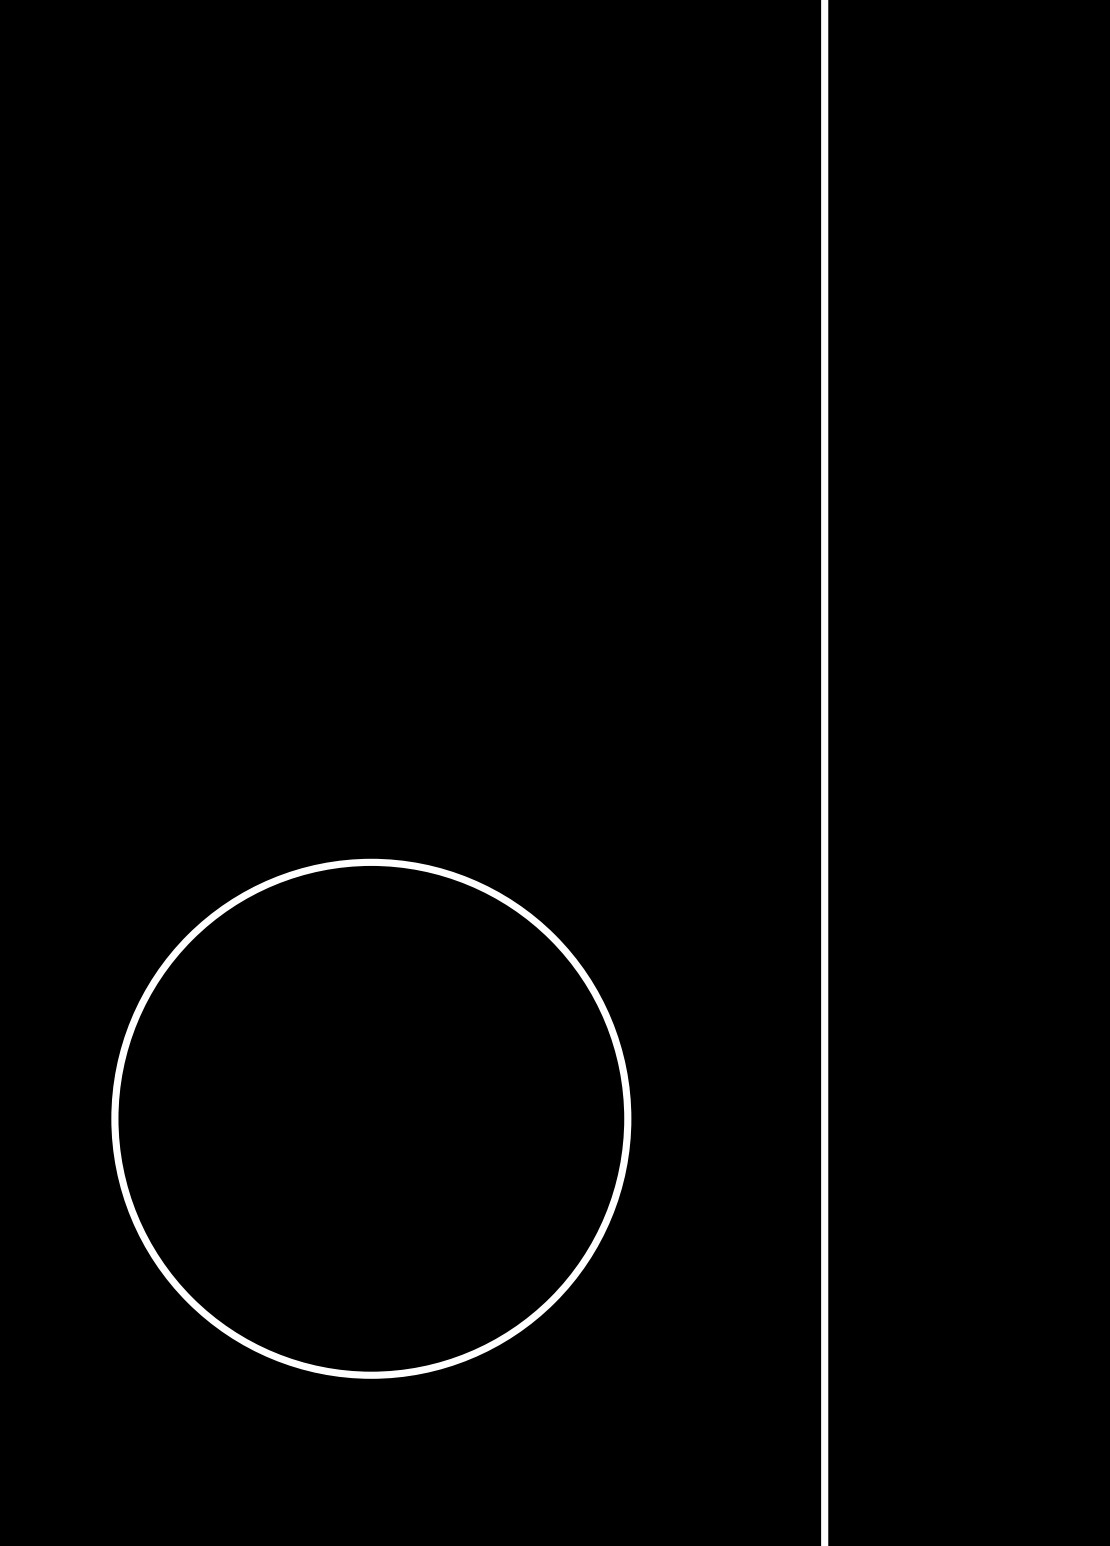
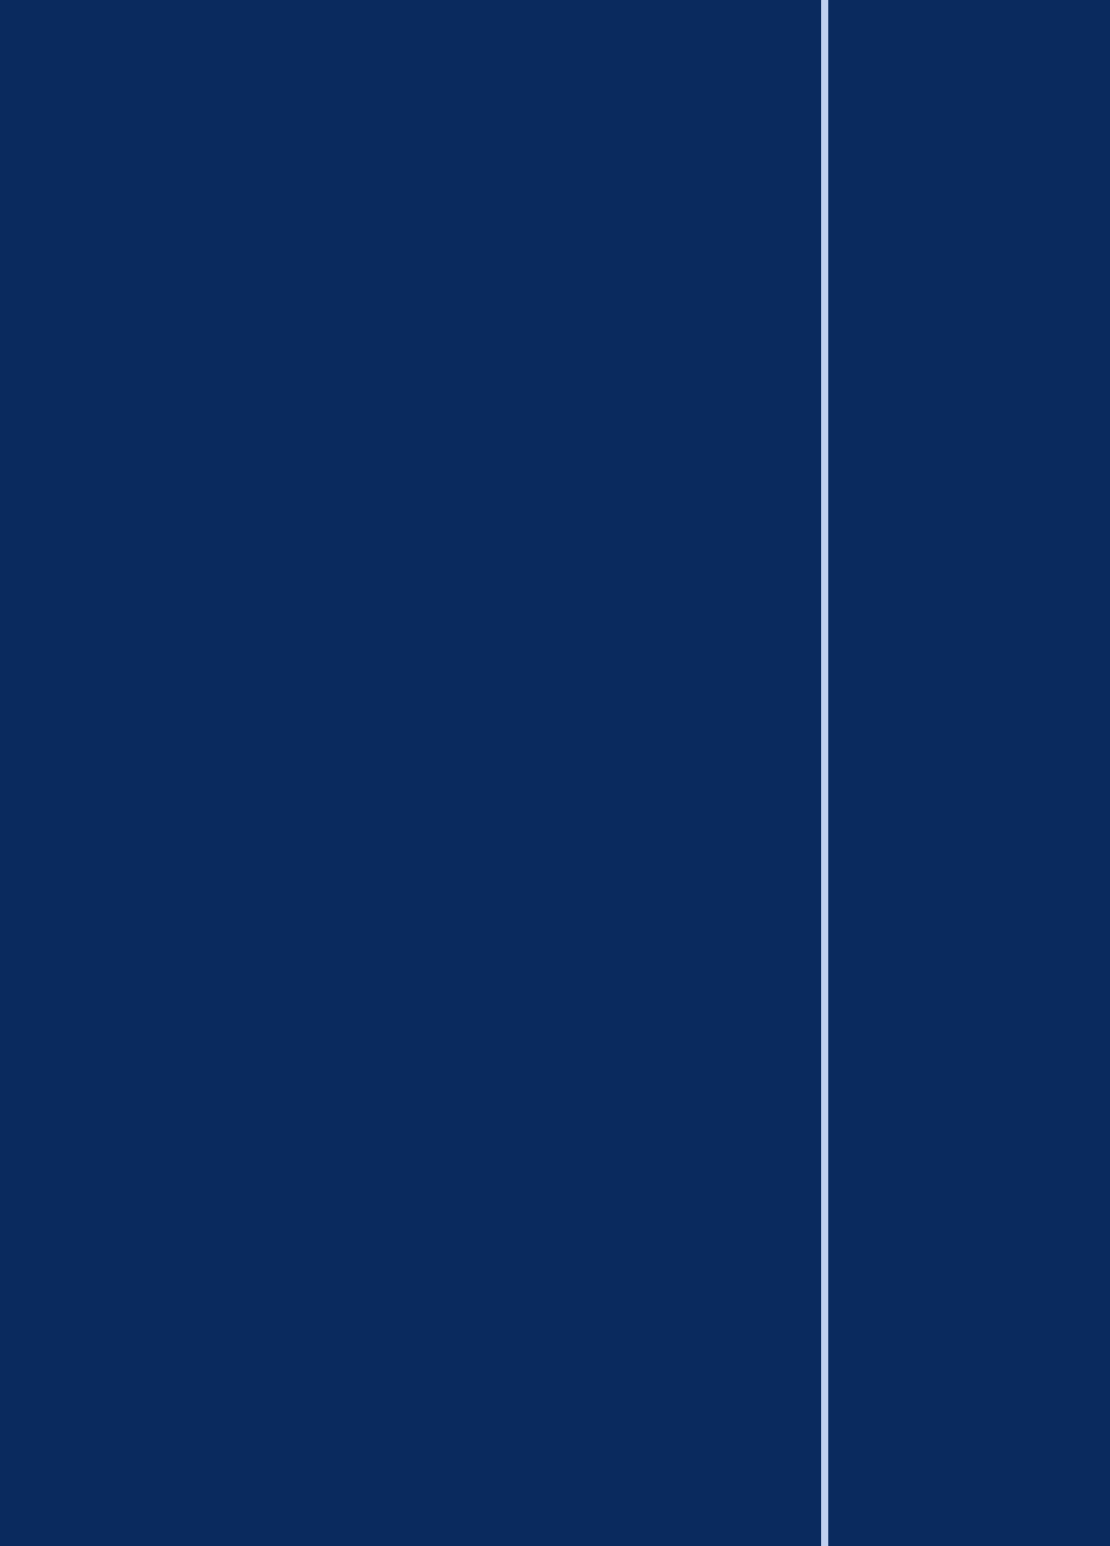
round board edge: [111, 858, 632, 1379] -> none

